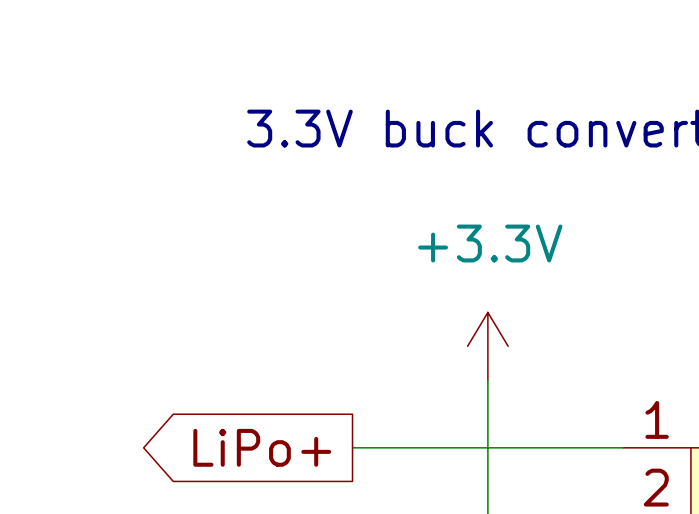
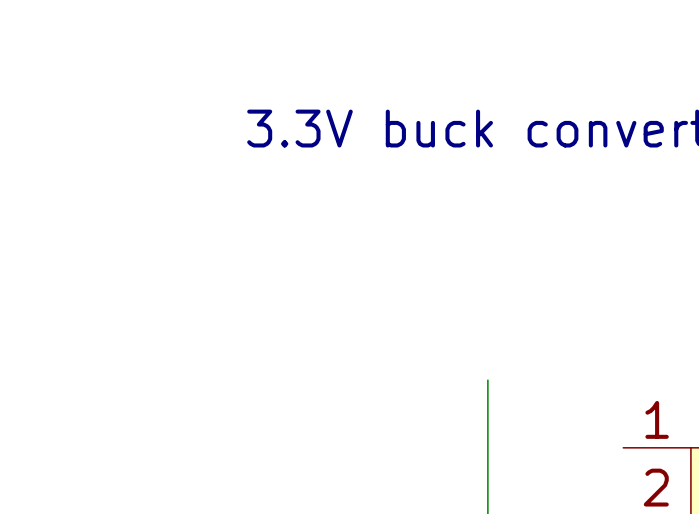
power symbol: +3.3V (487, 346) -> none
global label: LiPo+ (262, 447) -> none
wire: (352, 447) (623, 447) -> none

